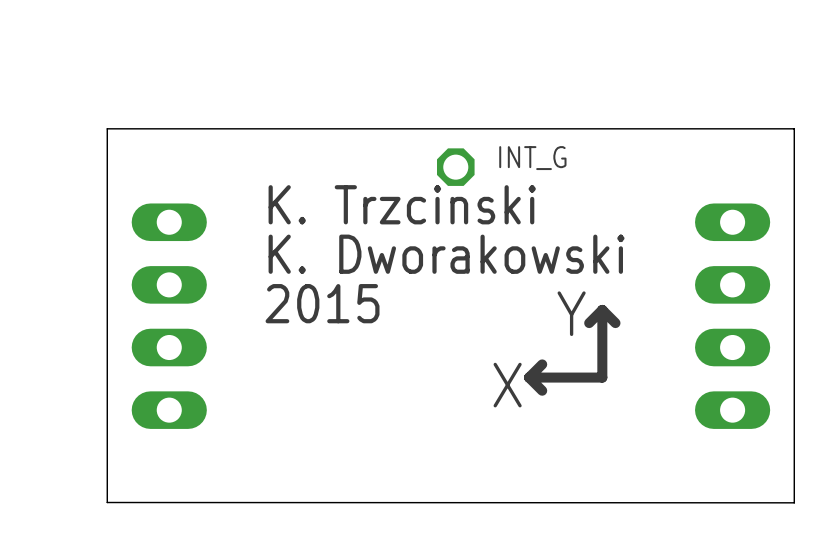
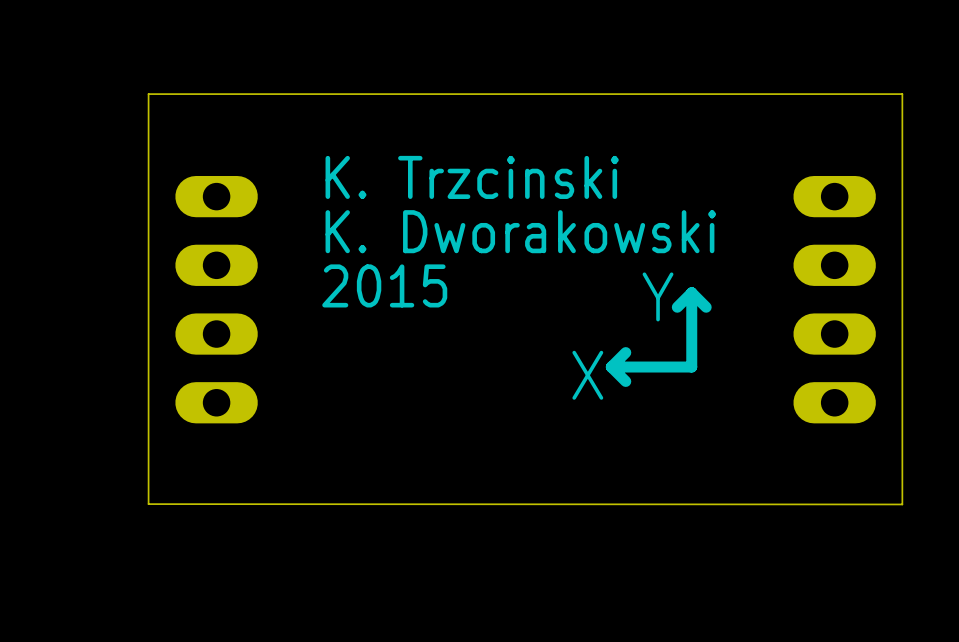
INT_G: (455, 167) -> none

